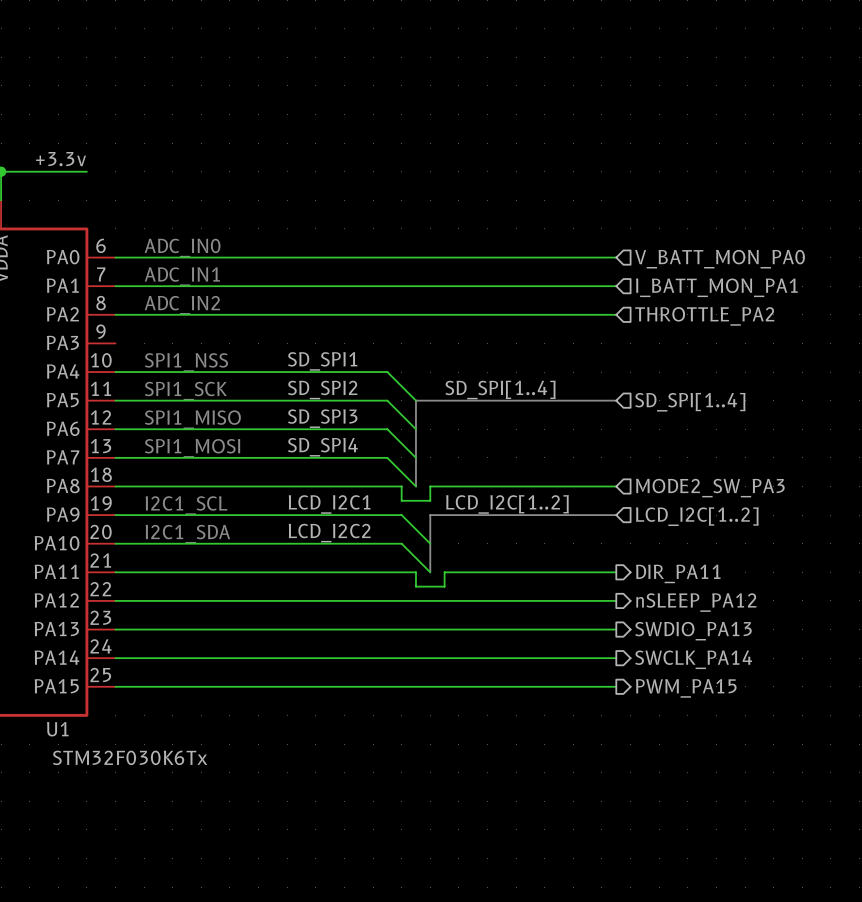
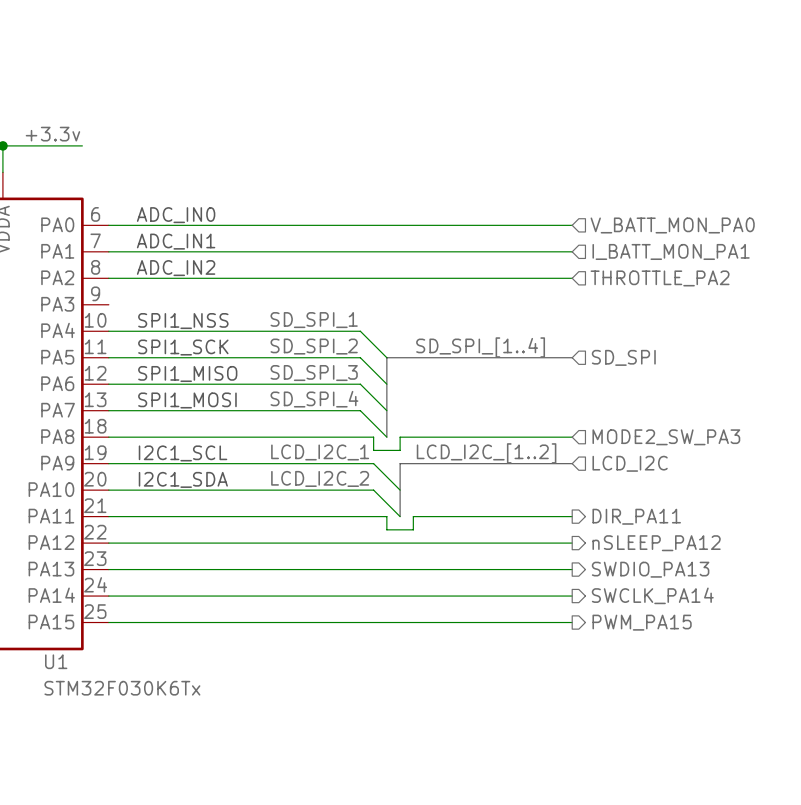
label: SD_SPI1 (322, 361) -> SD_SPI_1 (314, 320)
label: SD_SPI2 (322, 390) -> SD_SPI_2 (314, 346)
label: SD_SPI[1..4] (500, 390) -> SD_SPI_[1..4] (480, 347)
hierarchical label: SD_SPI[1..4] (690, 402) -> SD_SPI (623, 357)
label: SD_SPI3 (322, 418) -> SD_SPI_3 (314, 373)
label: SD_SPI4 (322, 447) -> SD_SPI_4 (314, 399)
label: LCD_I2C1 (329, 504) -> LCD_I2C_1 (320, 452)
label: LCD_I2C[1..2] (507, 504) -> LCD_I2C_[1..2] (486, 453)
hierarchical label: LCD_I2C[1..2] (697, 516) -> LCD_I2C (630, 463)
label: LCD_I2C2 (329, 533) -> LCD_I2C_2 (320, 478)

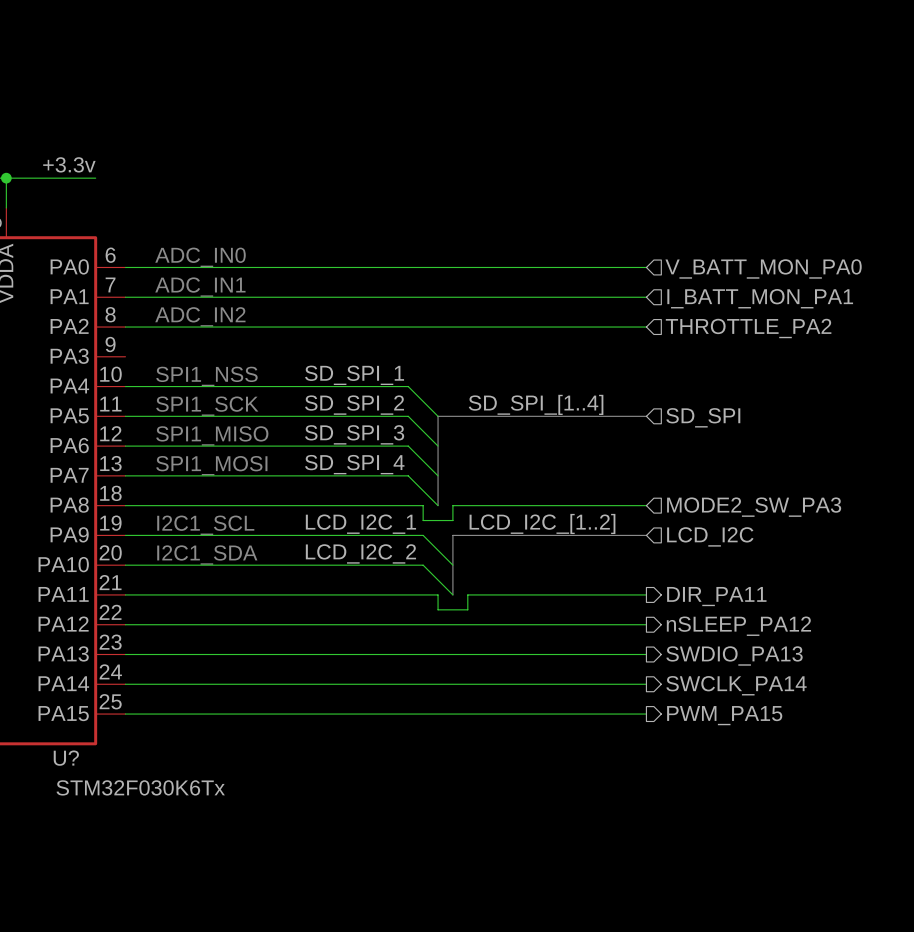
U1 name: U1 (56, 661) -> U? (66, 758)

